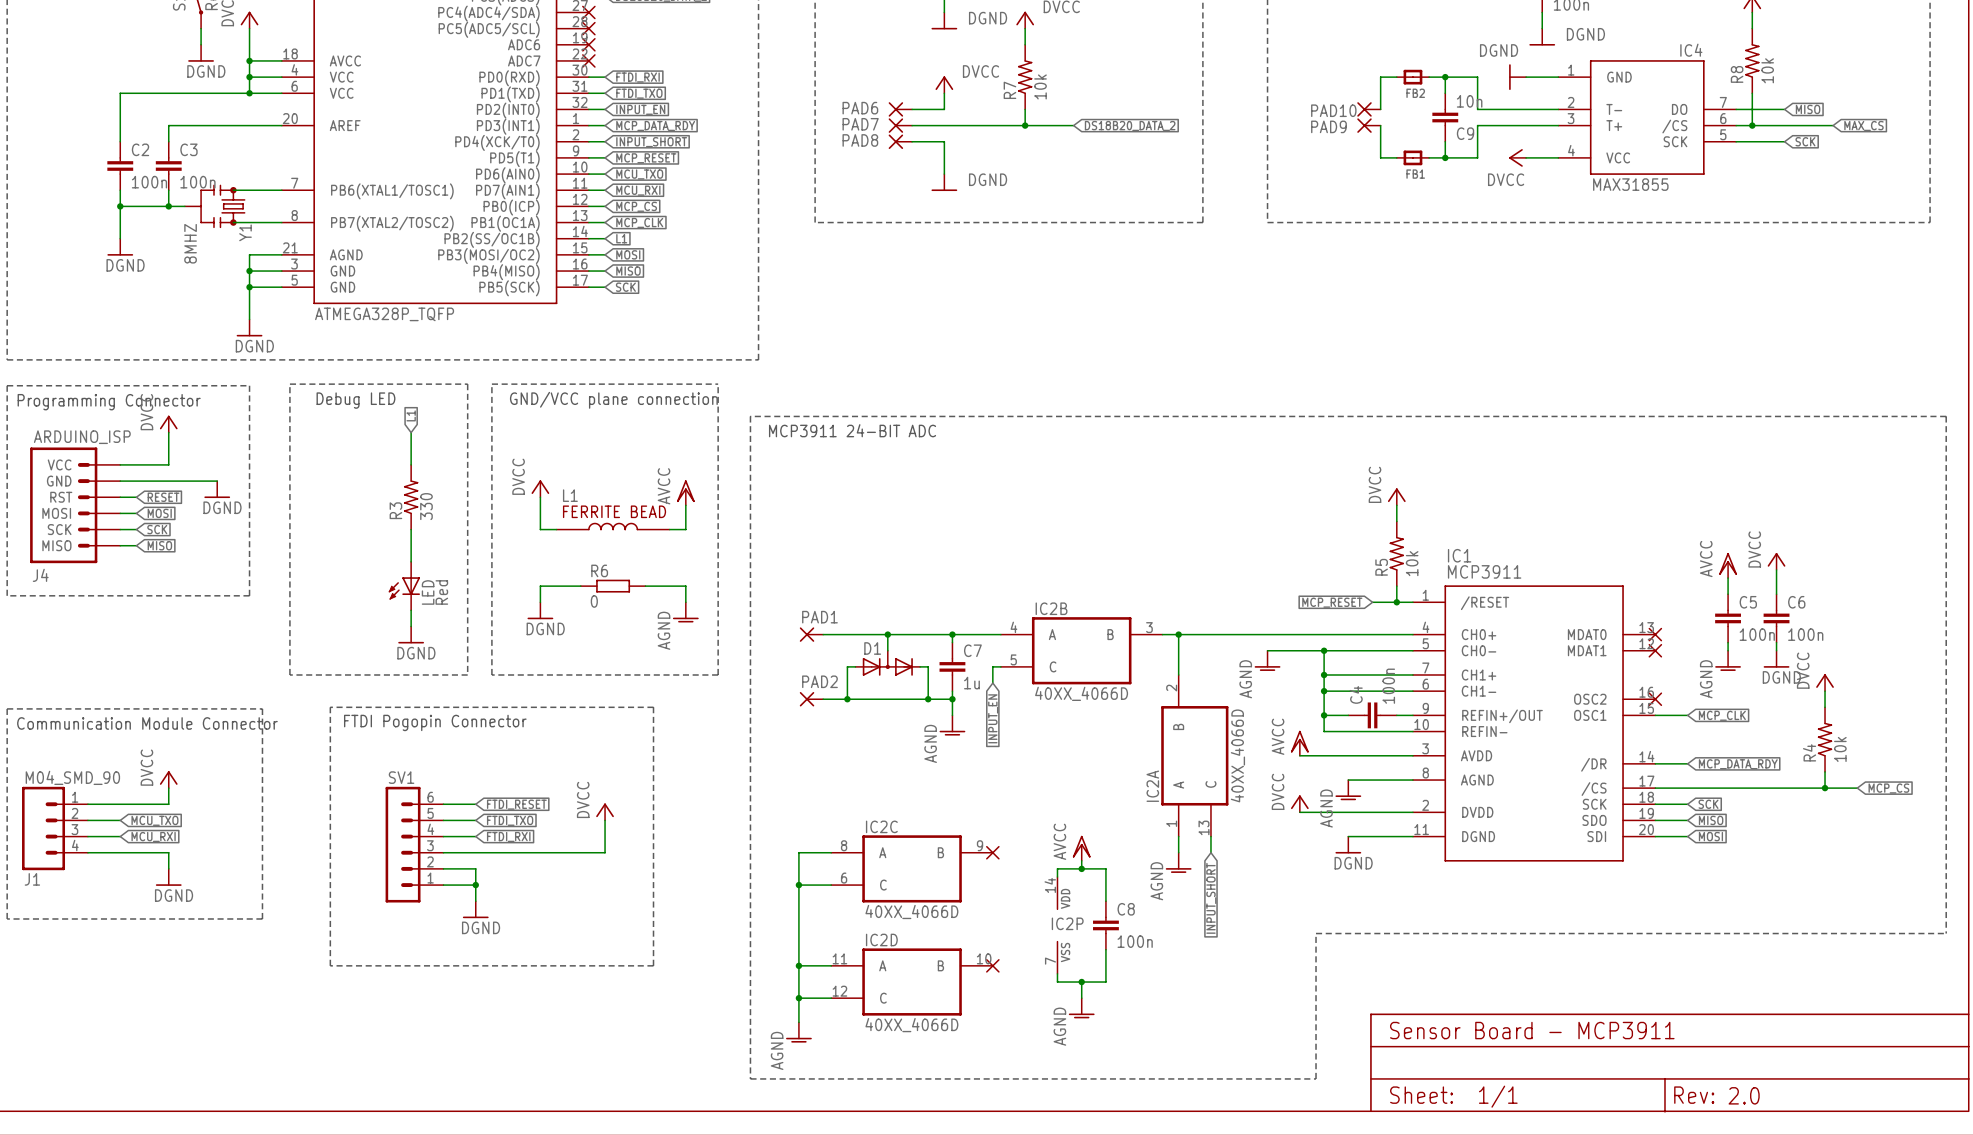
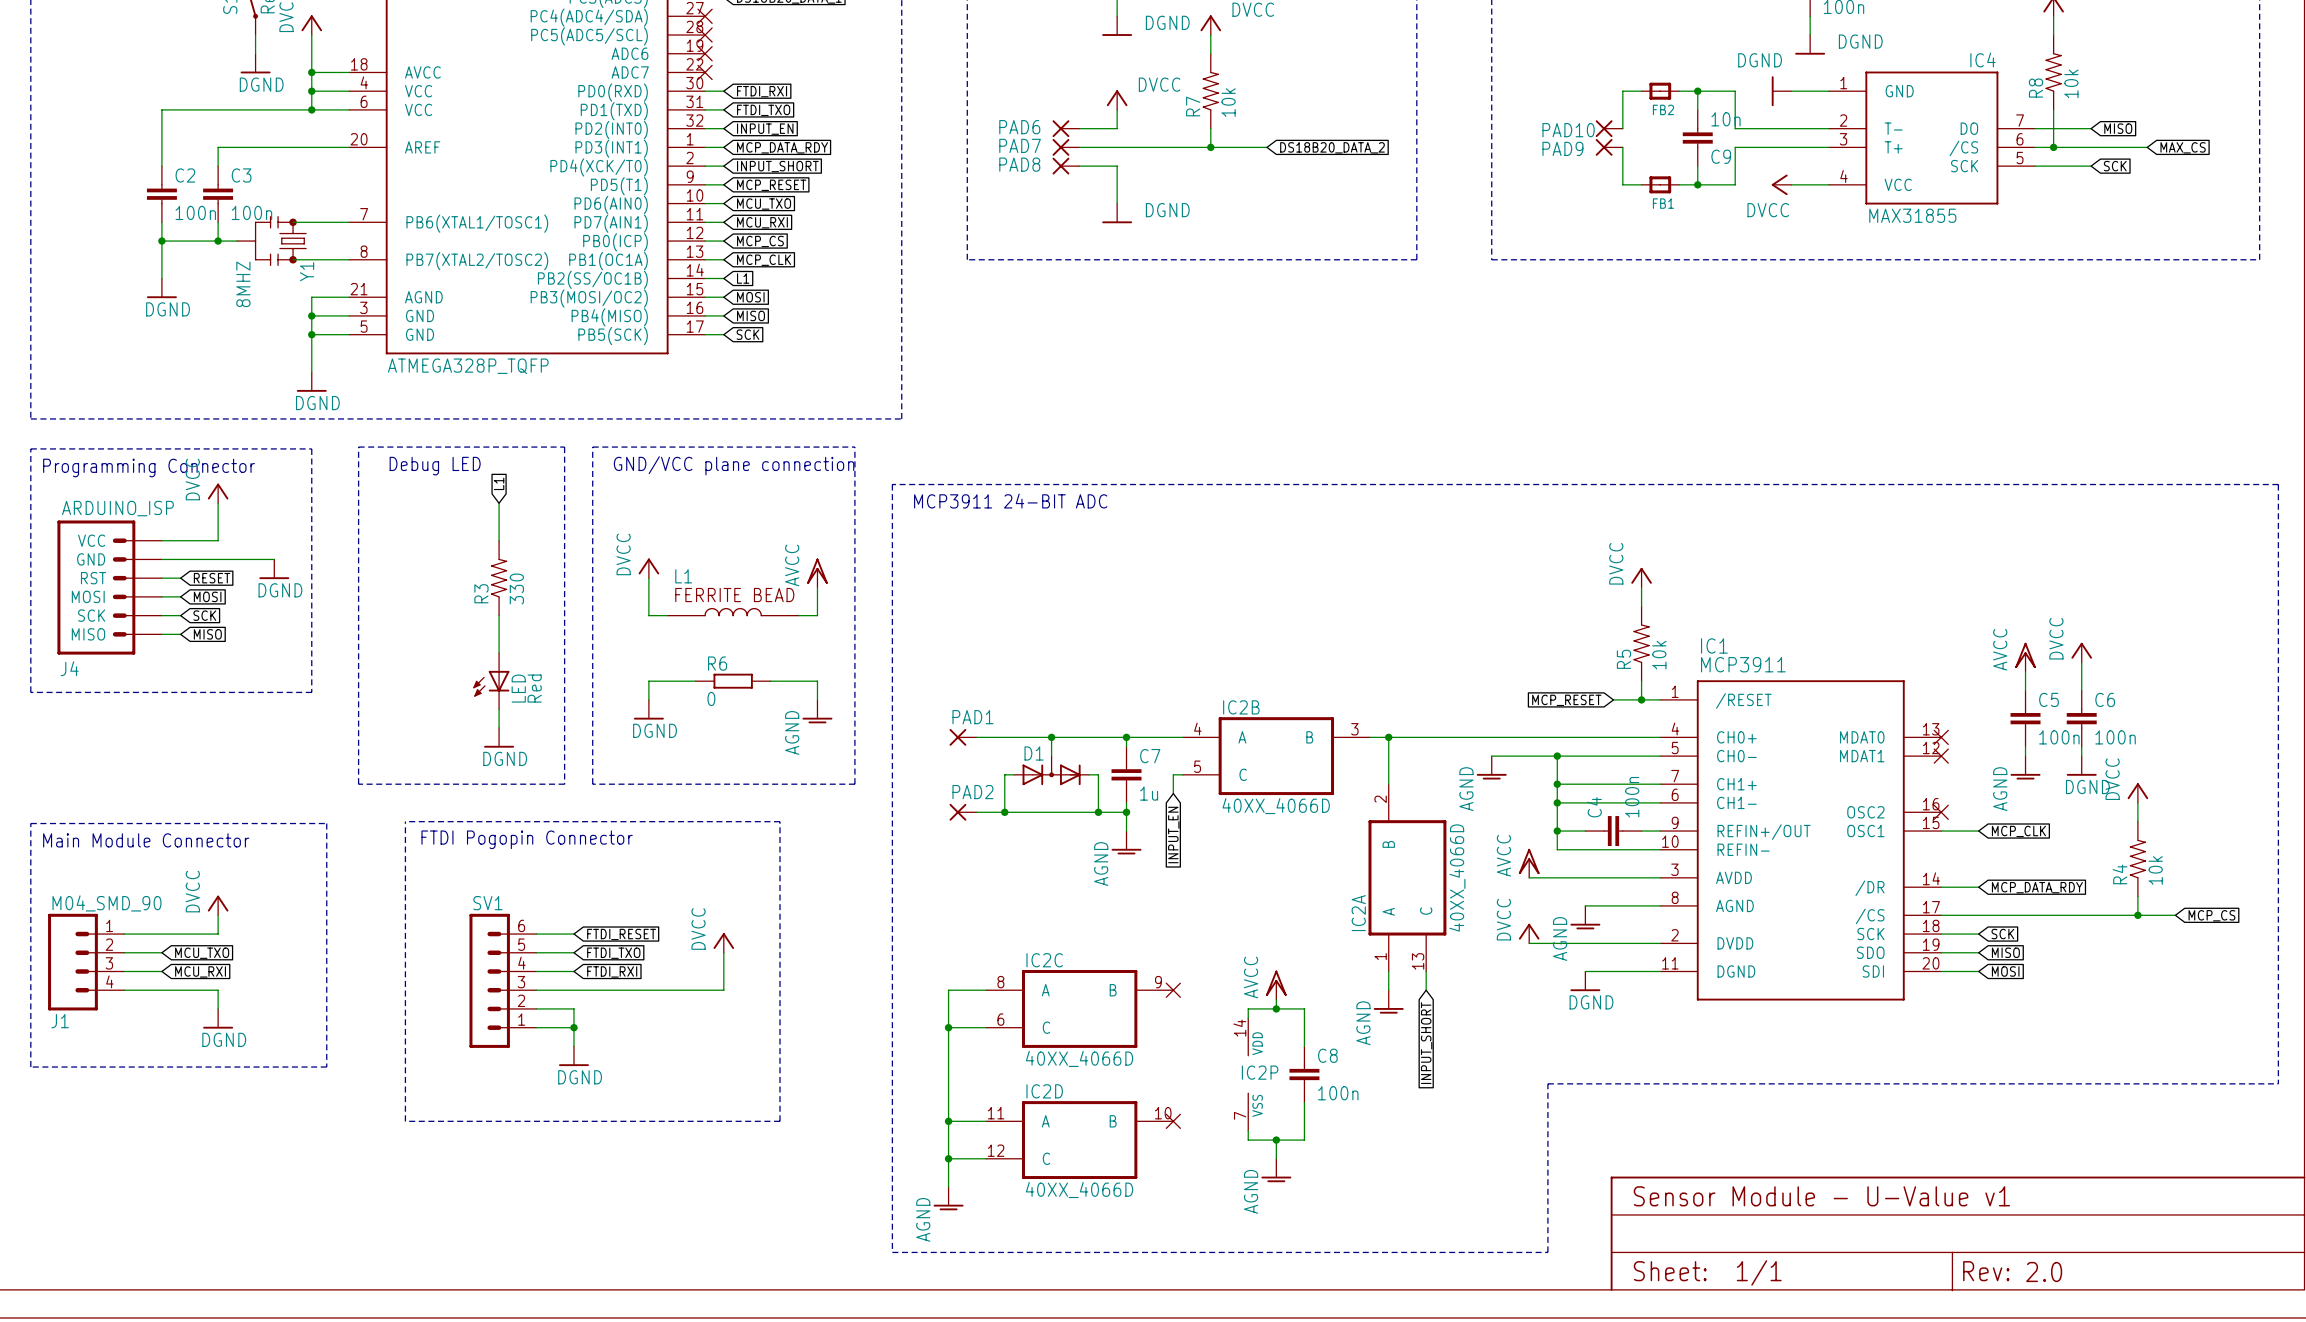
text: Communication Module Connector (147, 723) -> Main Module Connector (146, 840)
text: Sensor Board - MCP3911 (1532, 1030) -> Sensor Module - U-Value v1 (1821, 1196)

